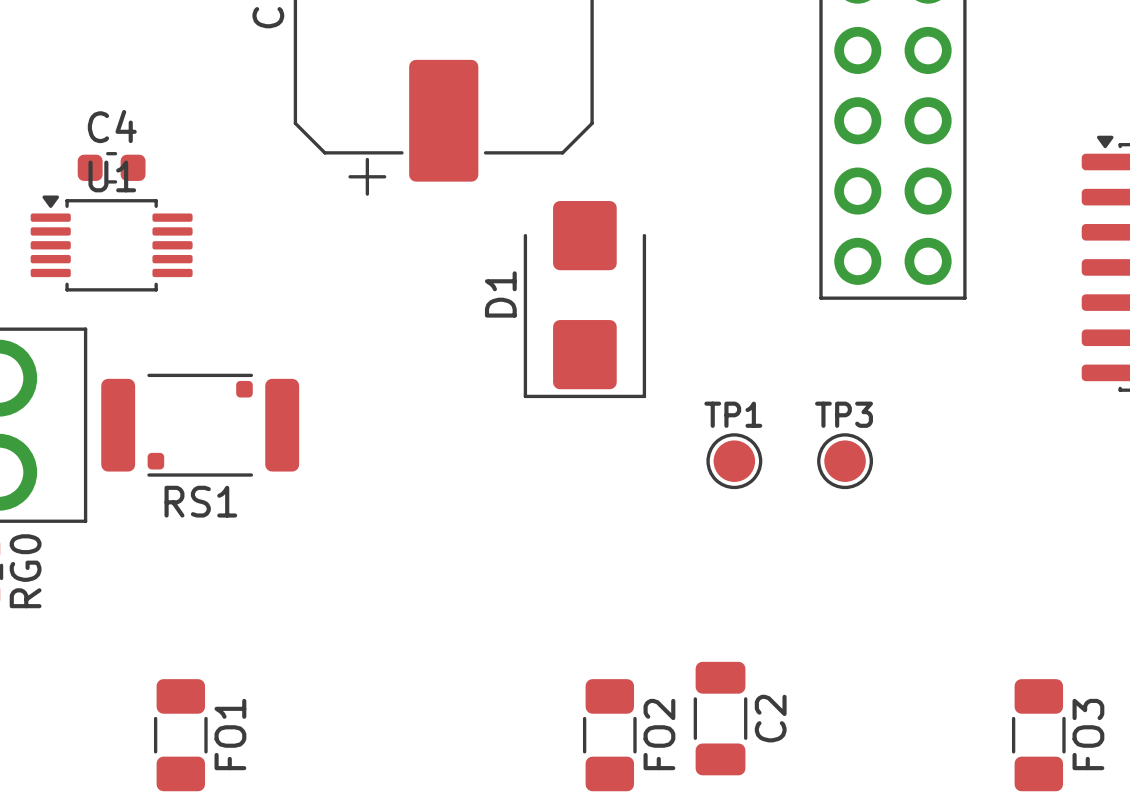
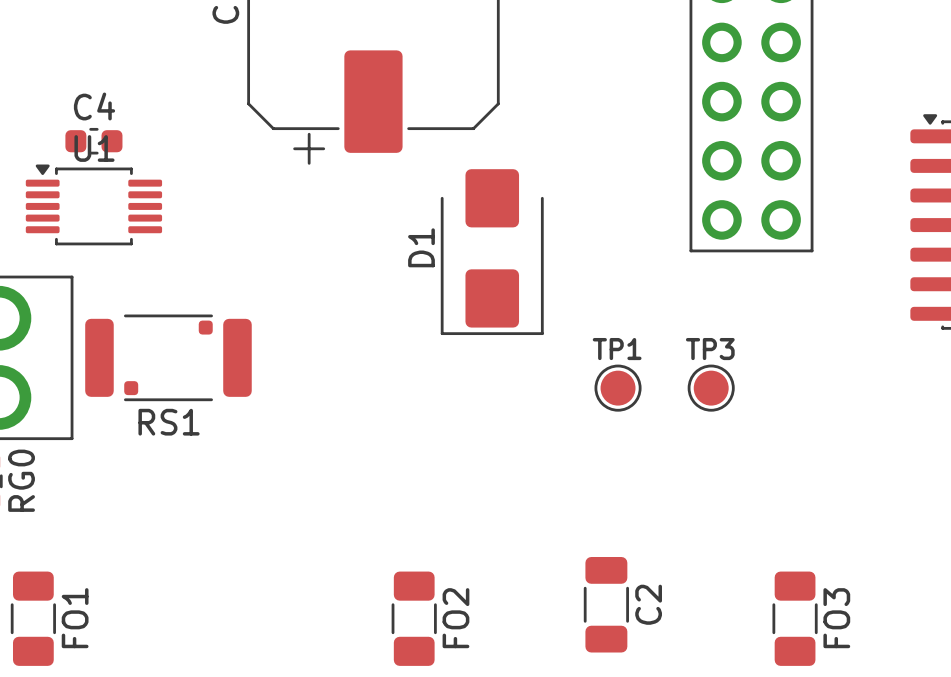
FO1 position: (180, 735) -> (33, 618)
FO2 position: (609, 735) -> (414, 618)
FO3 position: (1038, 735) -> (795, 618)

